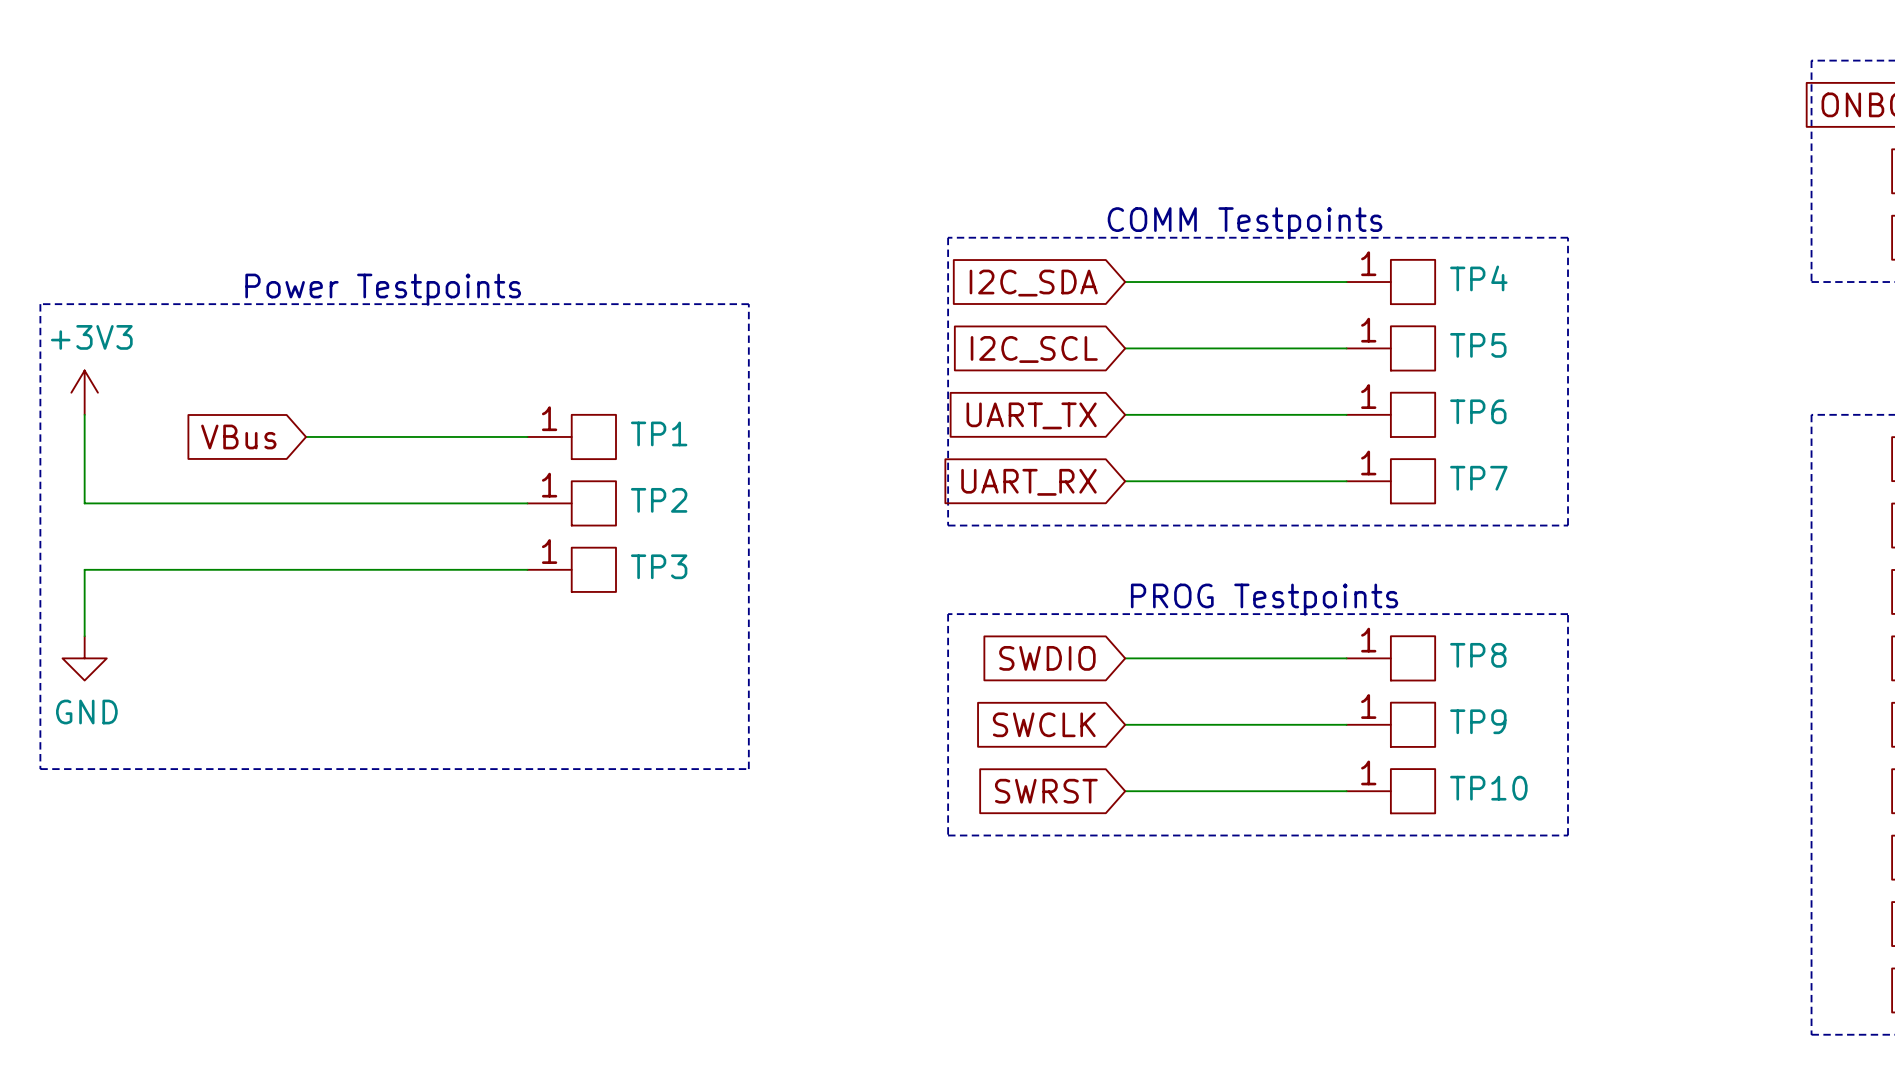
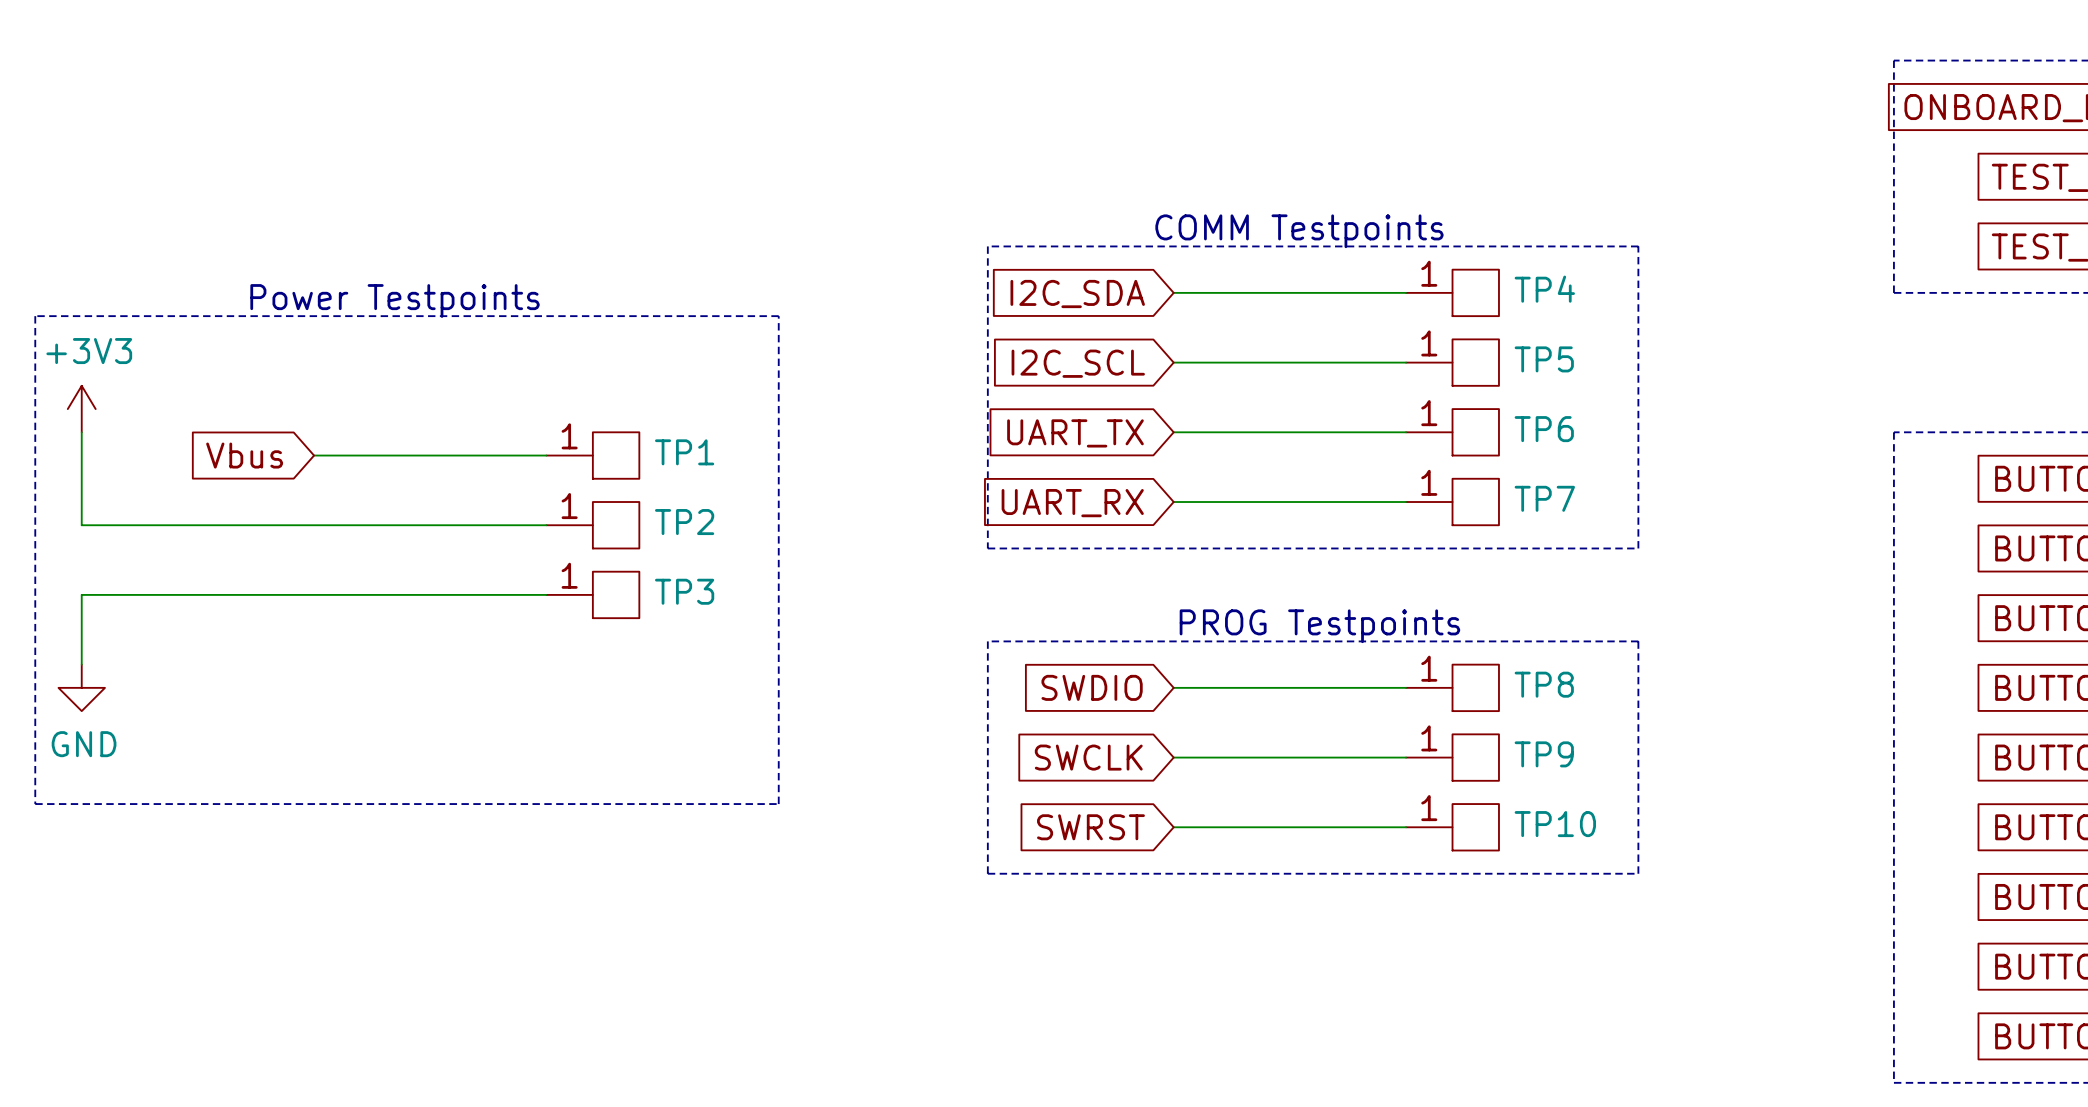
global label: VBus (238, 436) -> Vbus (244, 455)

